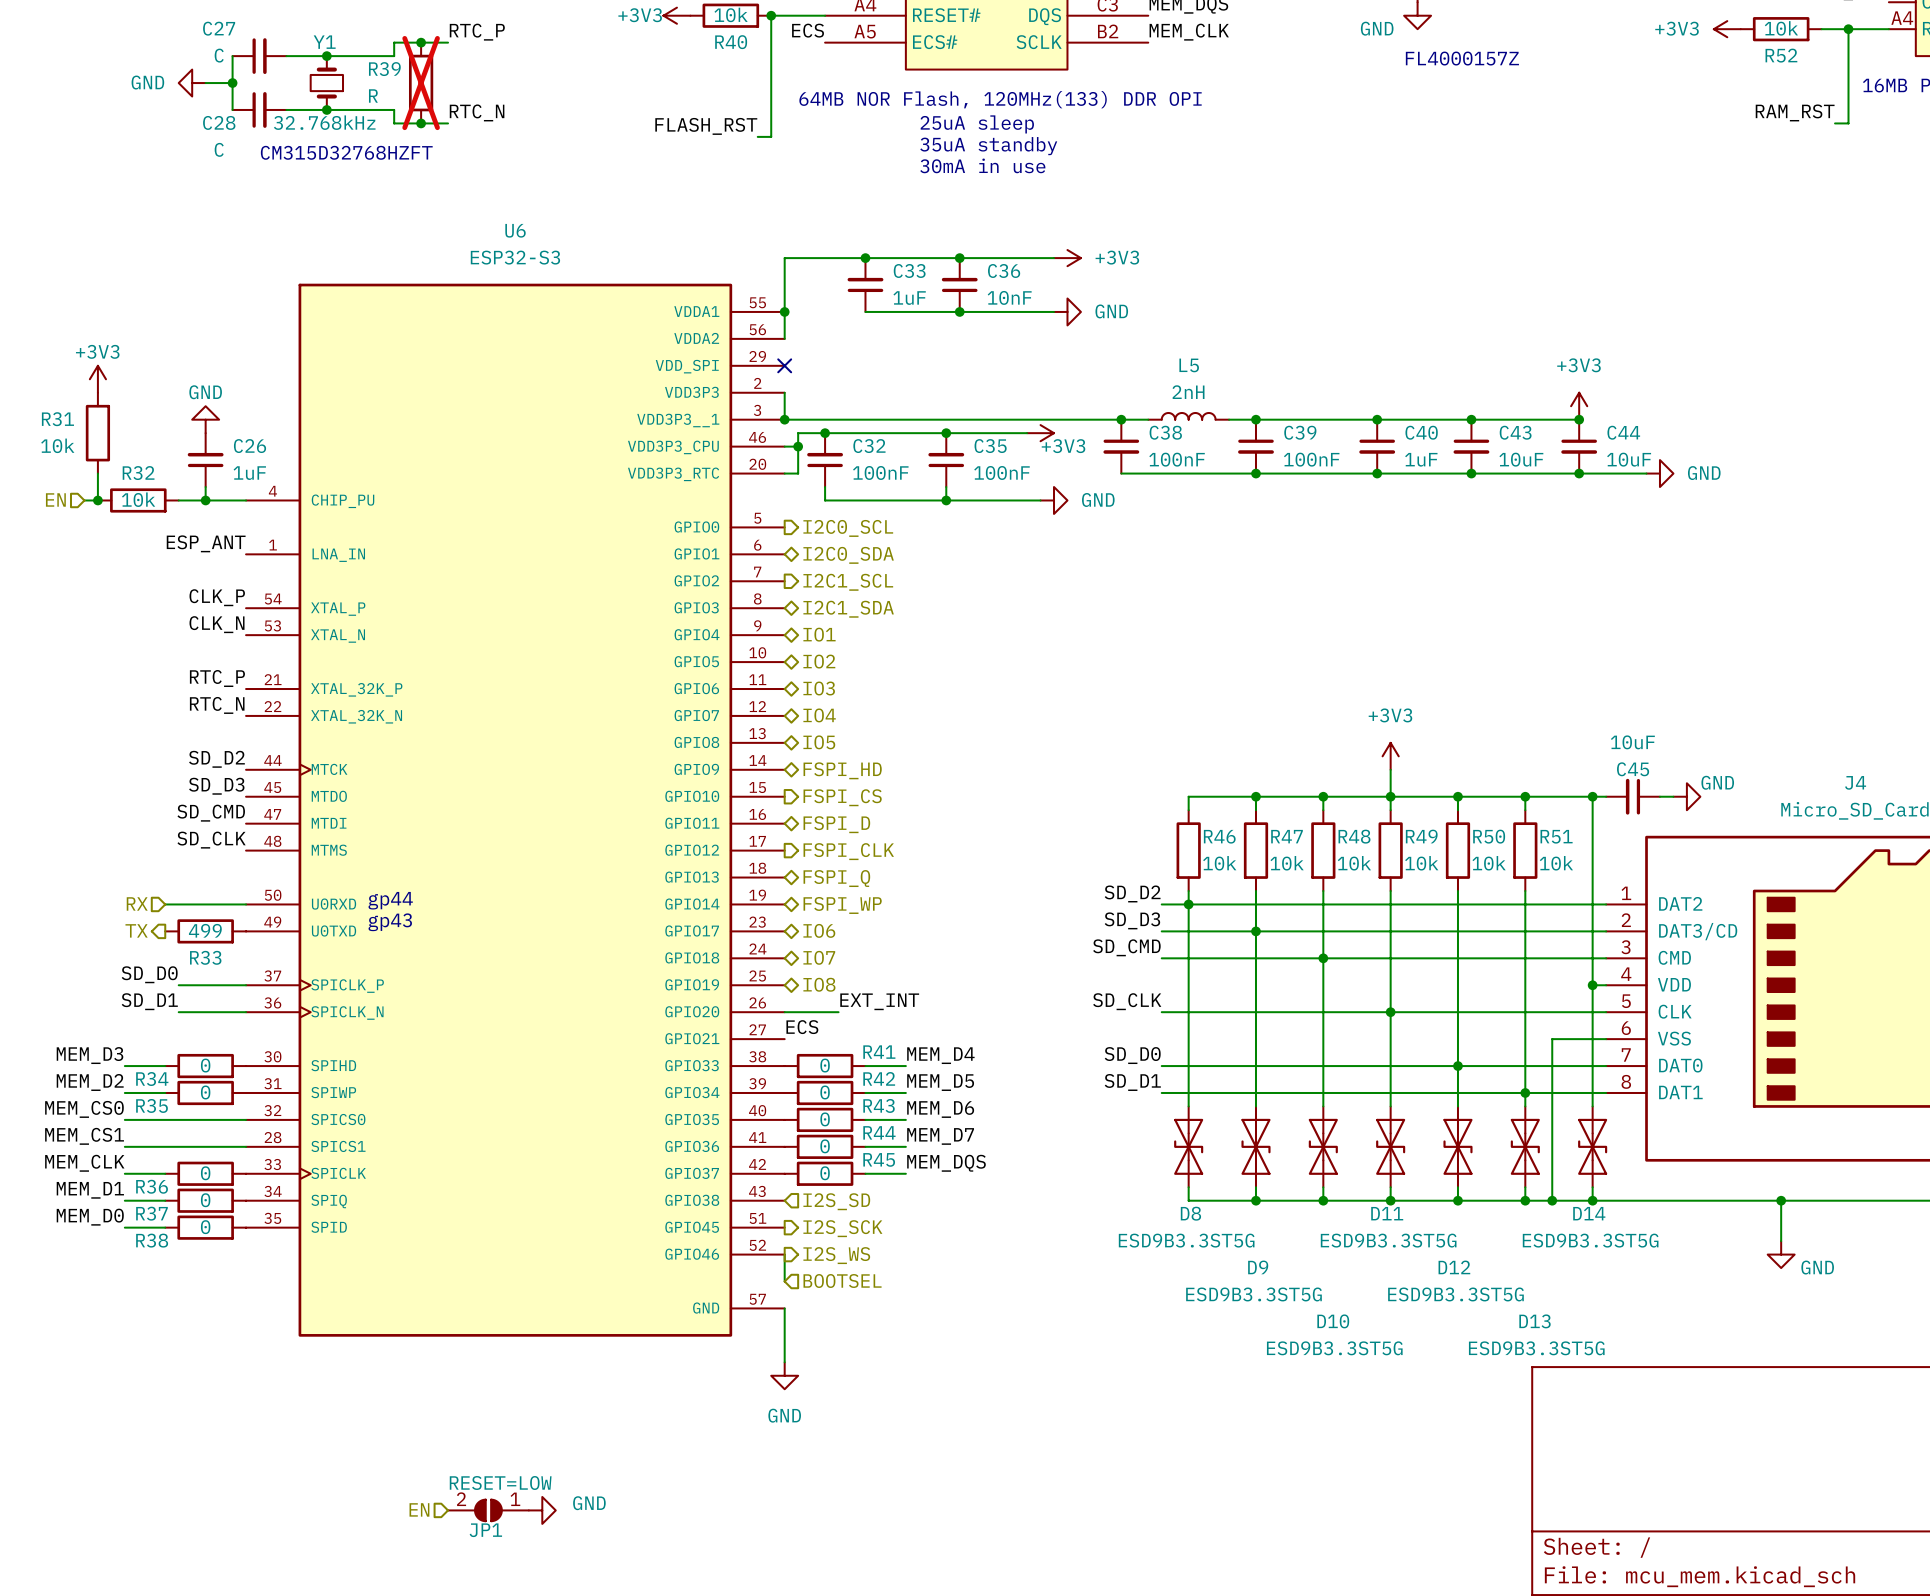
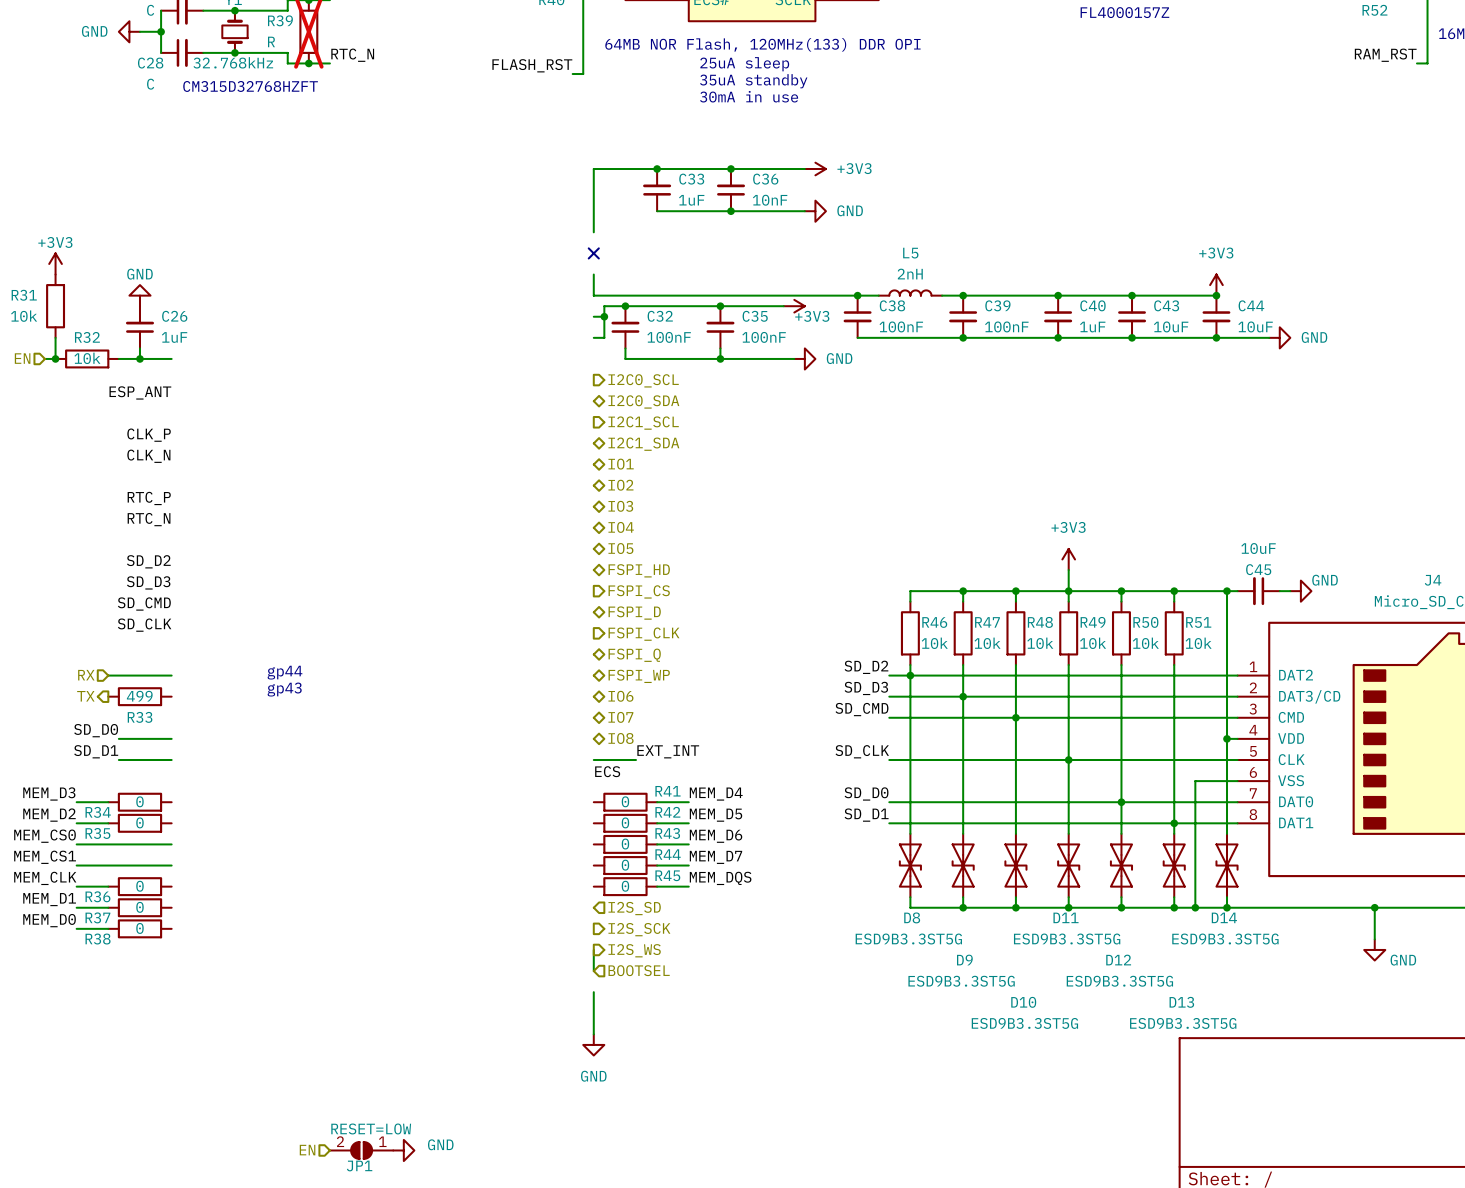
junction: (784, 311) -> none
junction: (784, 419) -> none
U6: ESP32-S3 (515, 810) -> none

